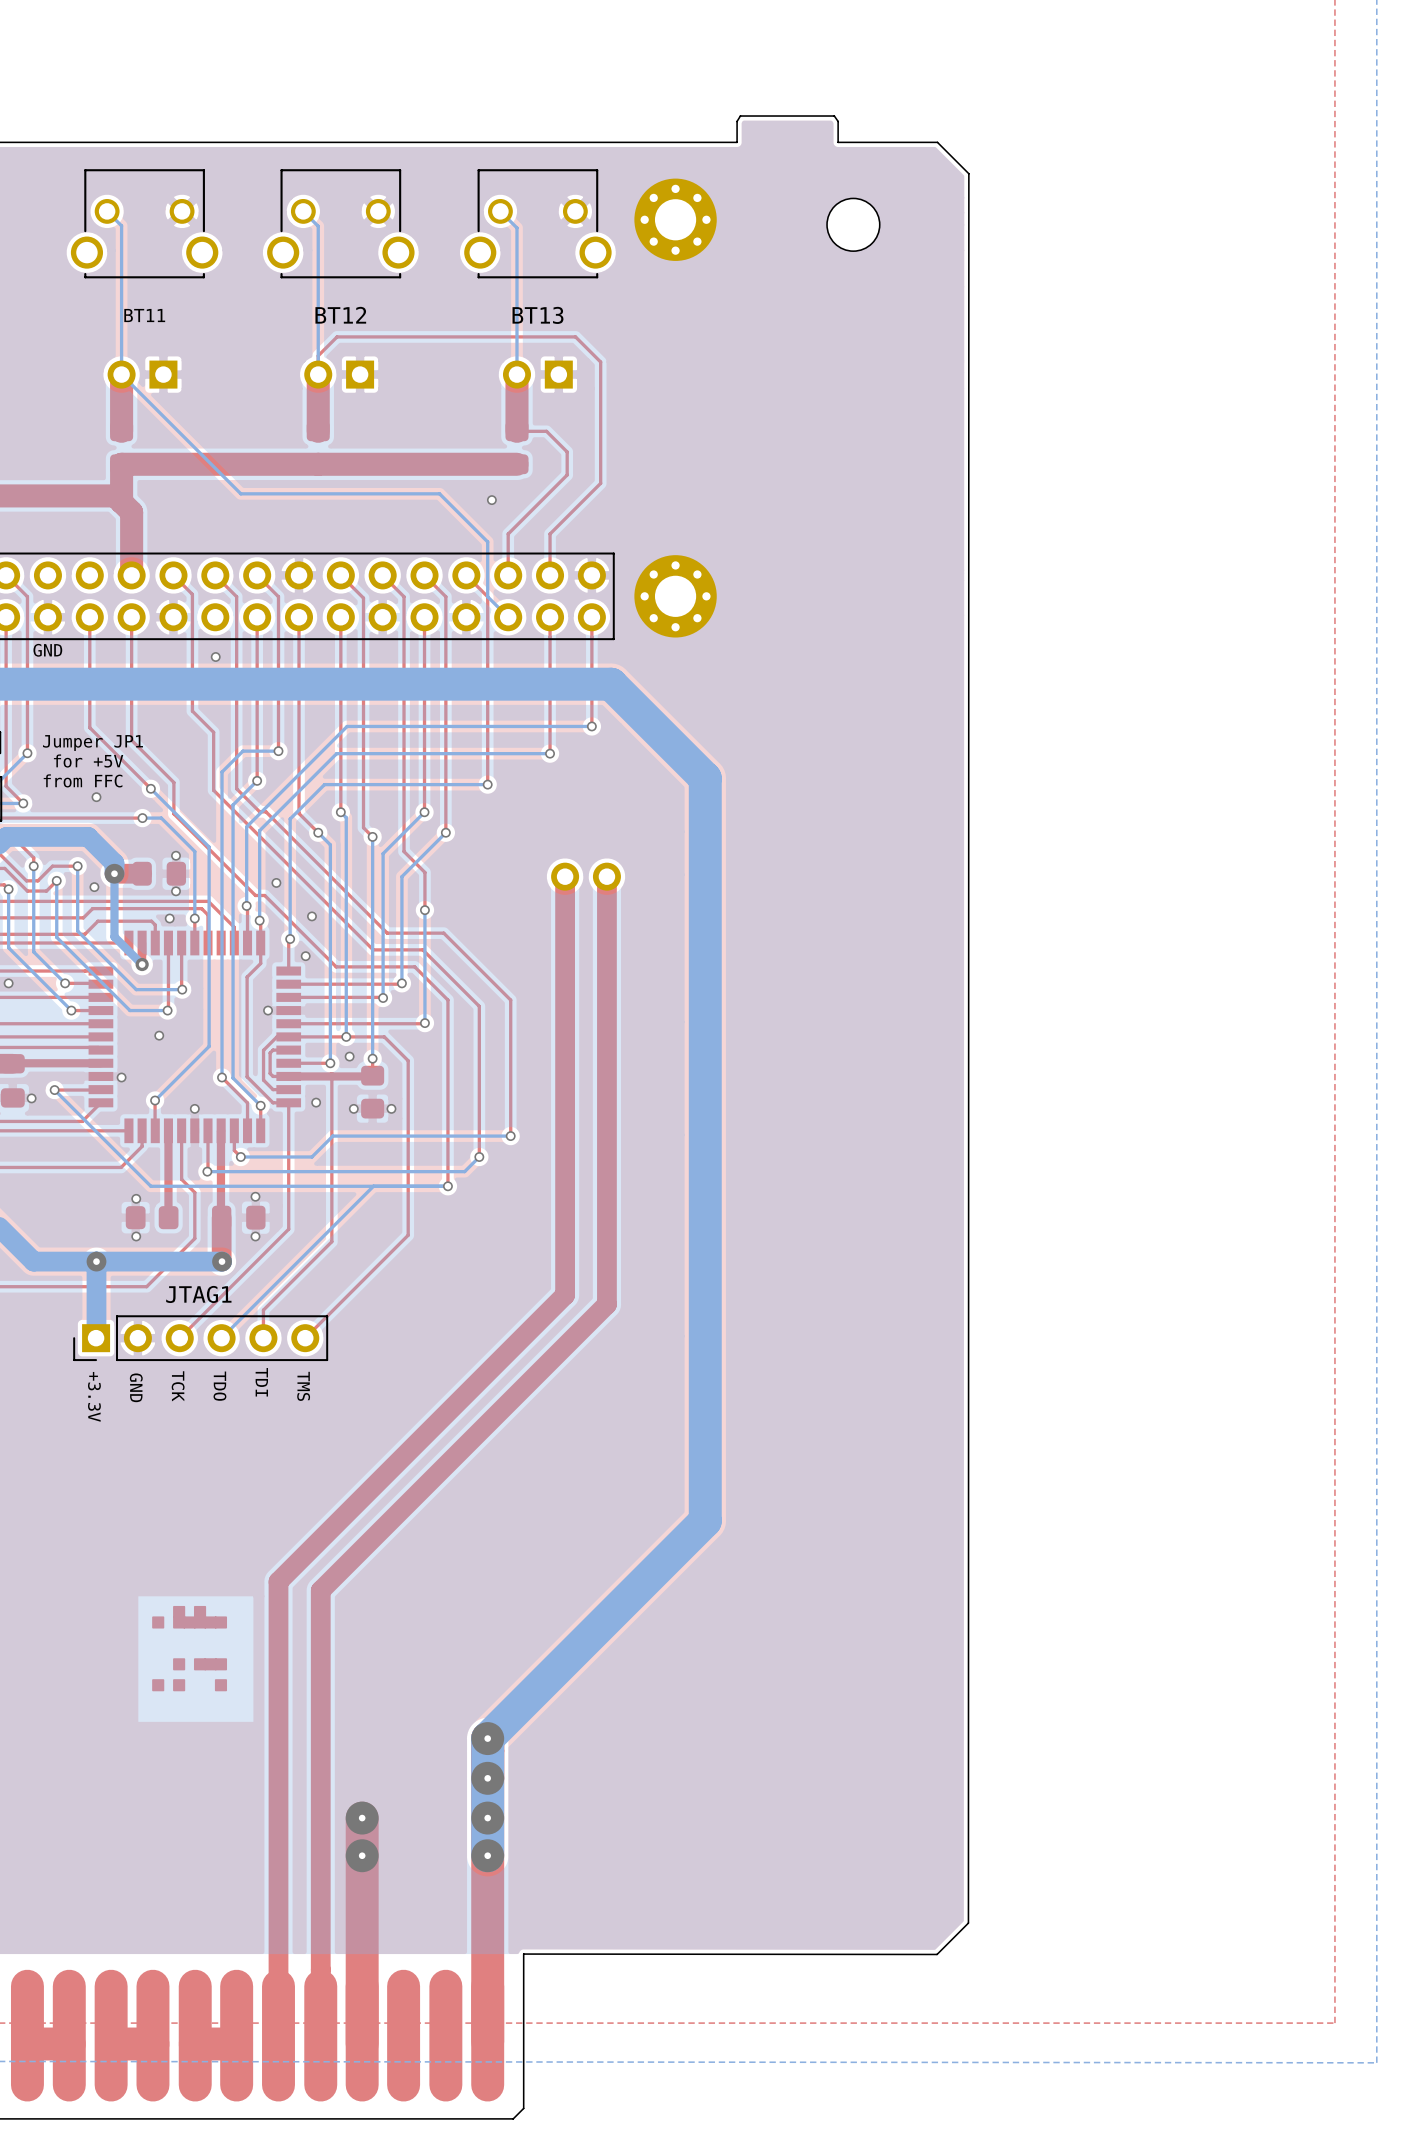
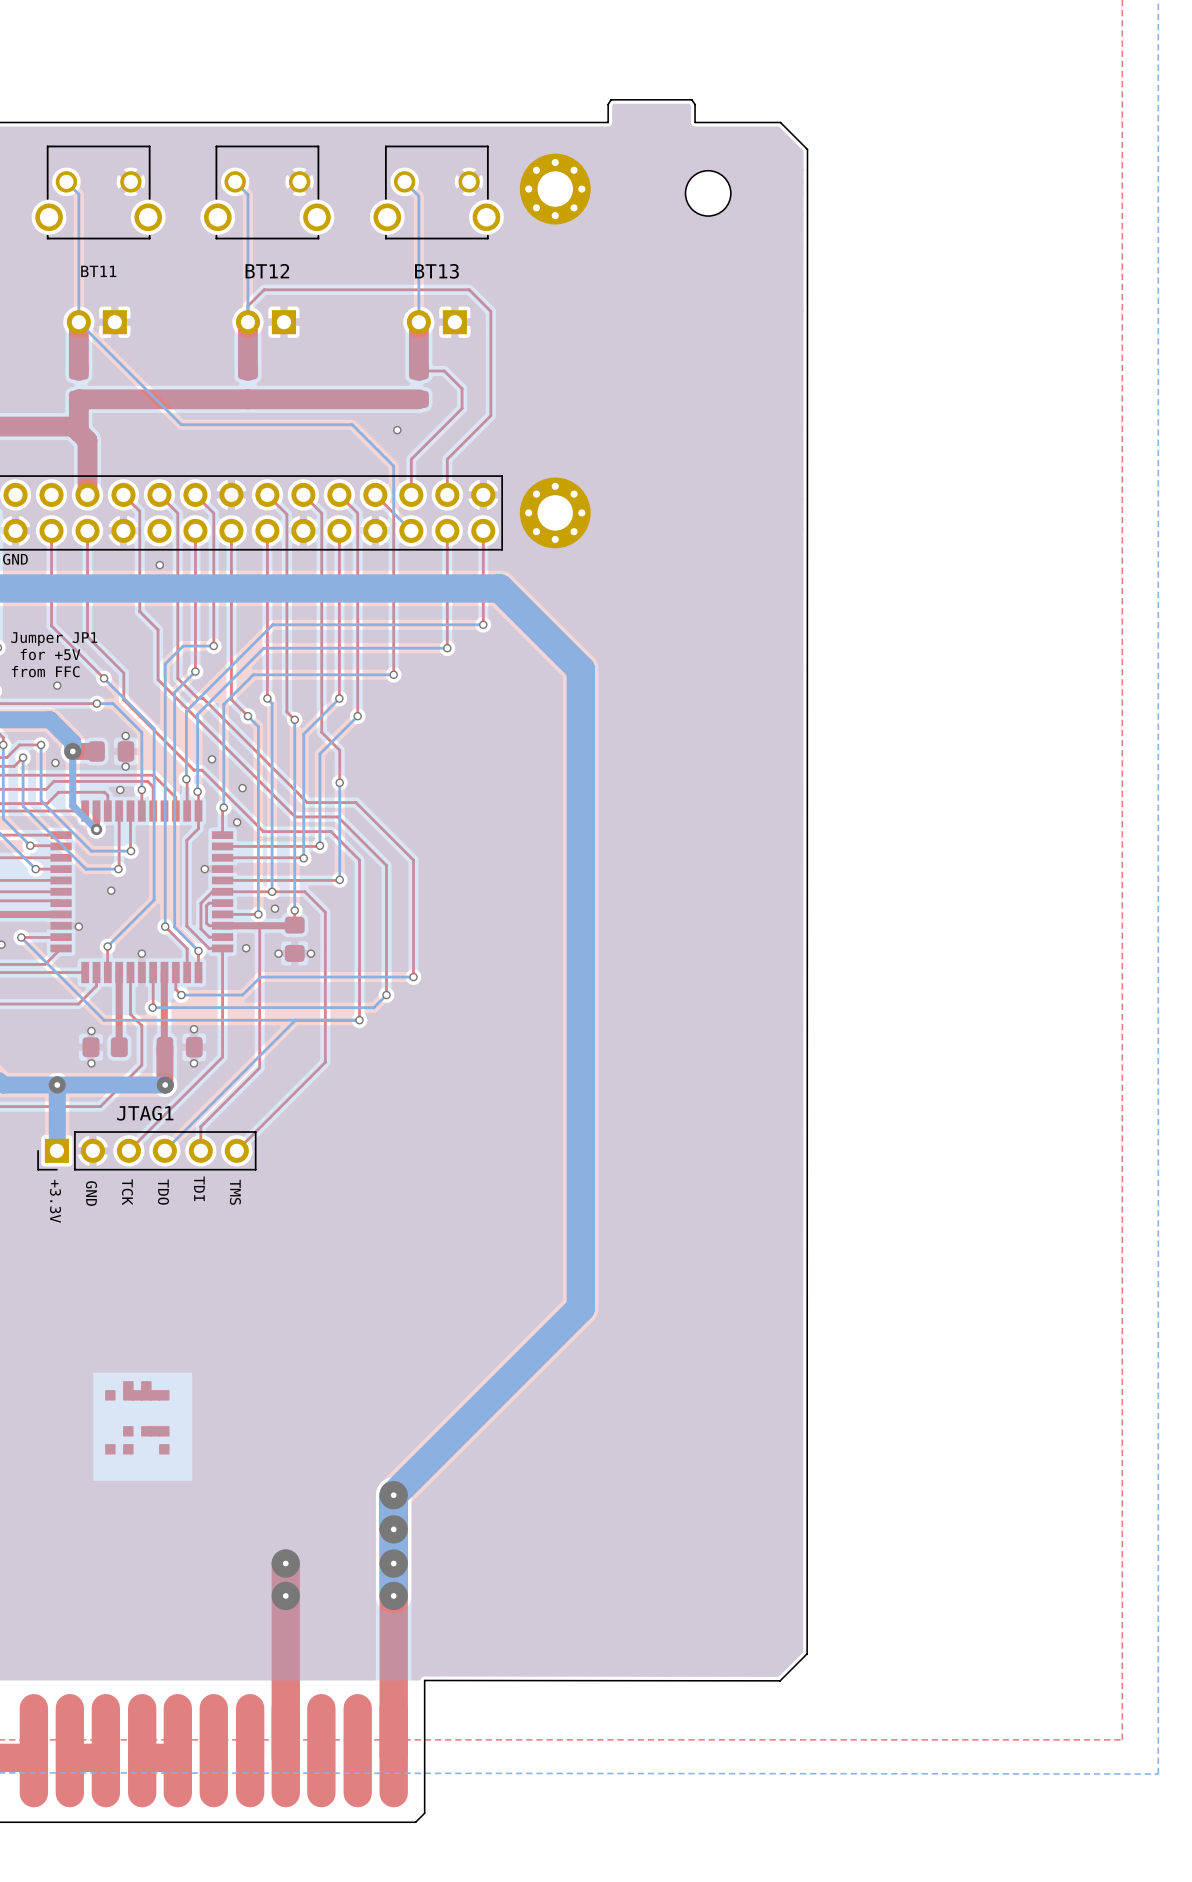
top track: (565, 876) (565, 1295) (278, 1581) (278, 2035) -> none
part: (586, 876) -> none
top track: (606, 876) (606, 1304) (320, 1590) (320, 2035) -> none

